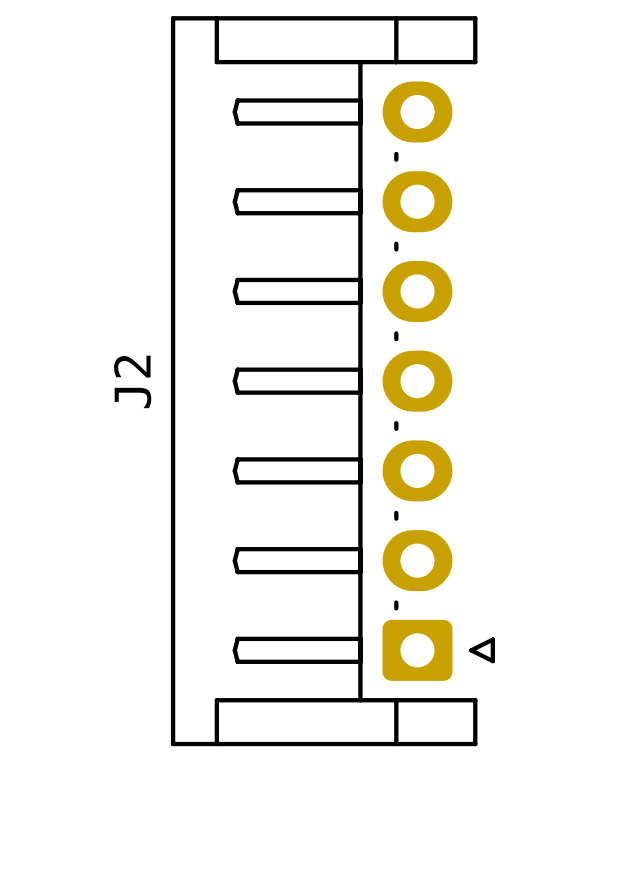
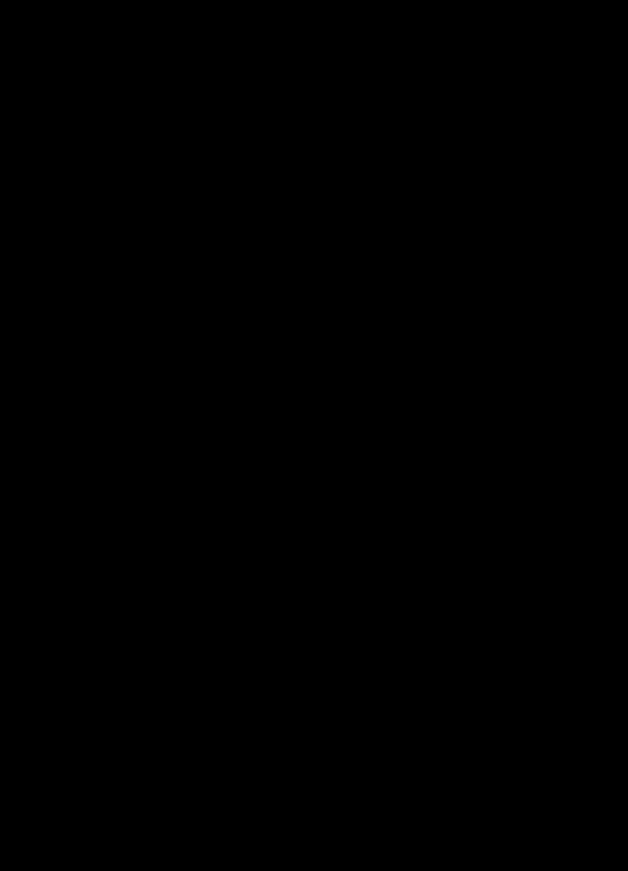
J2: (332, 381) -> none

